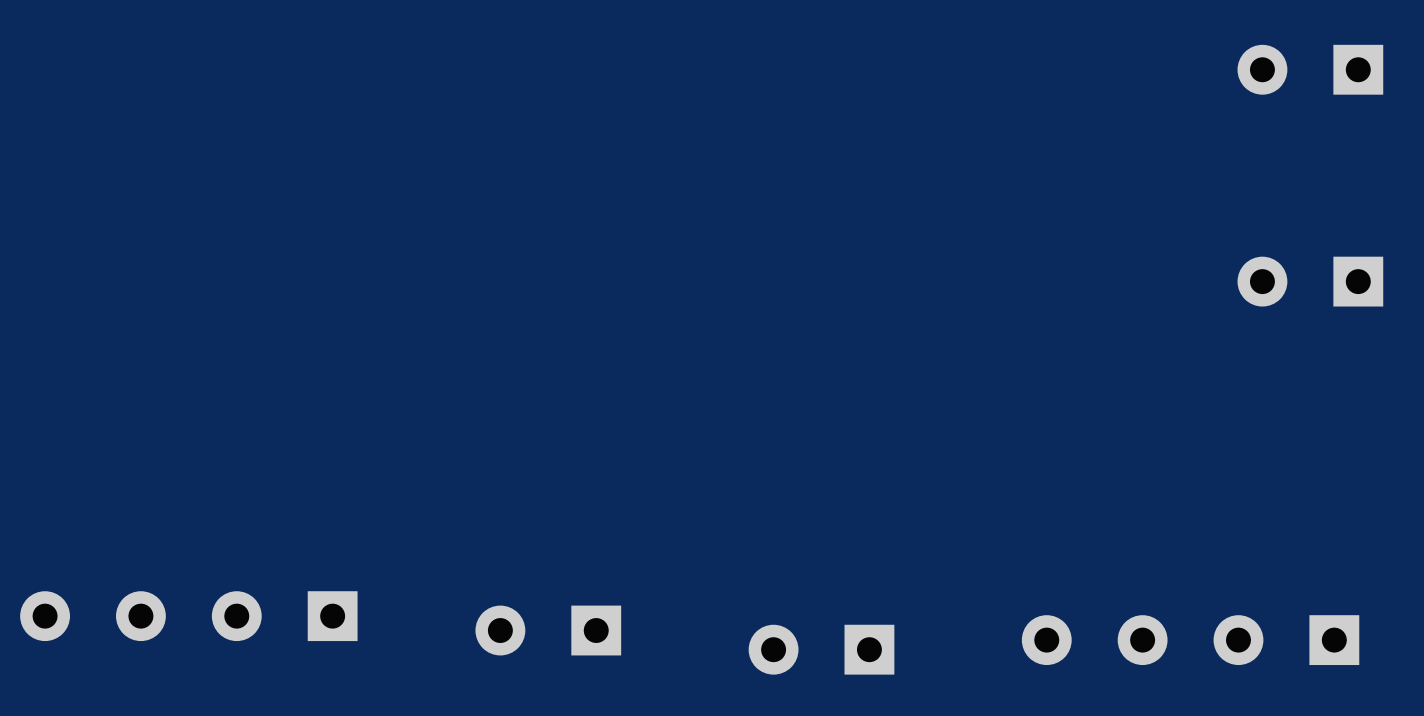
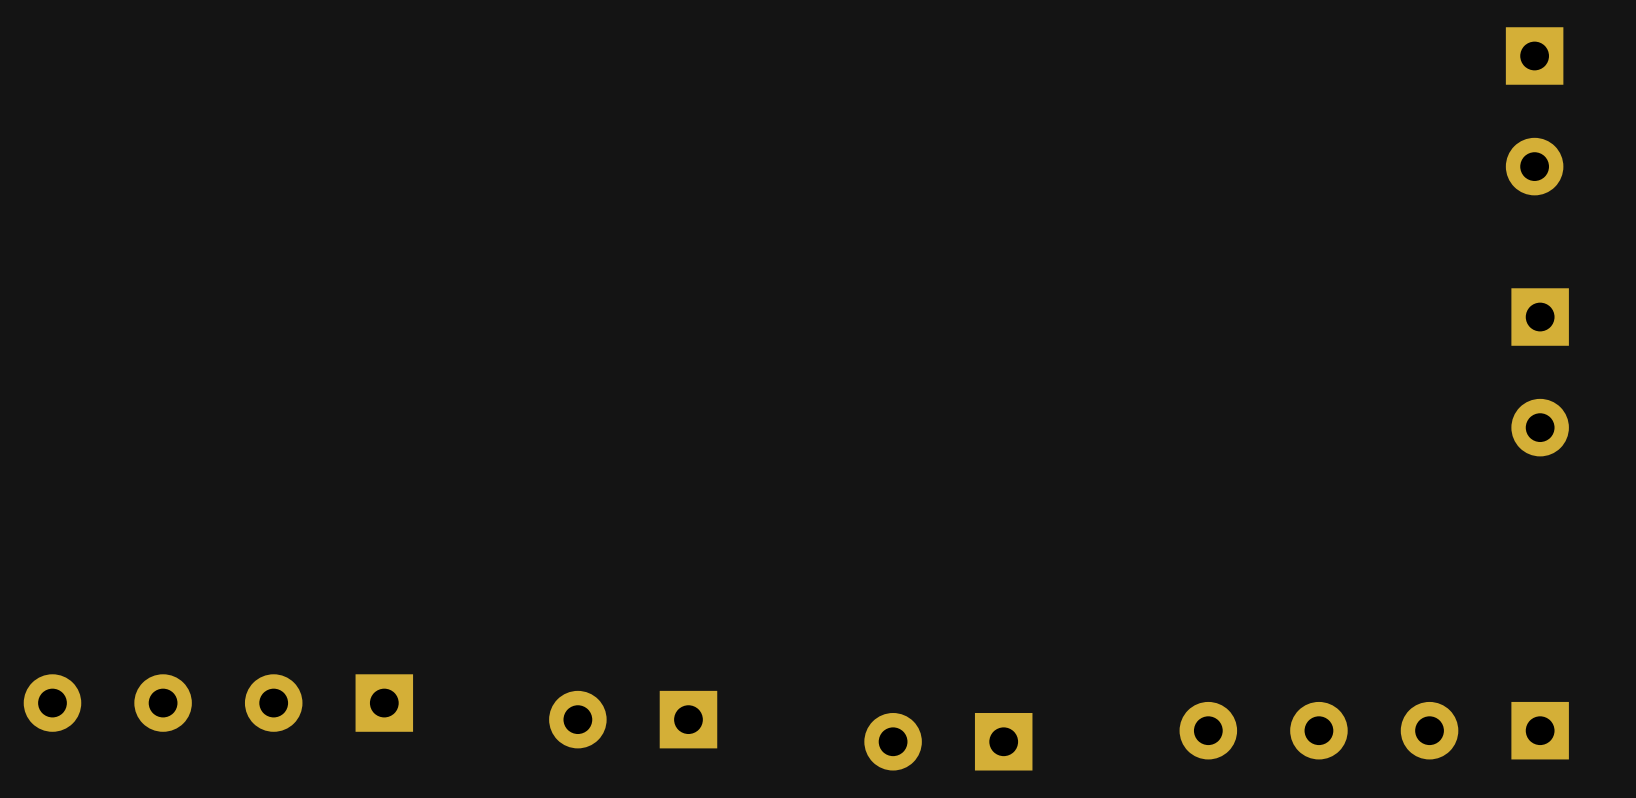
part rotation: 0° (1310, 69) -> 90° counterclockwise (1534, 111)
part rotation: 0° (1310, 281) -> 90° counterclockwise (1540, 372)

